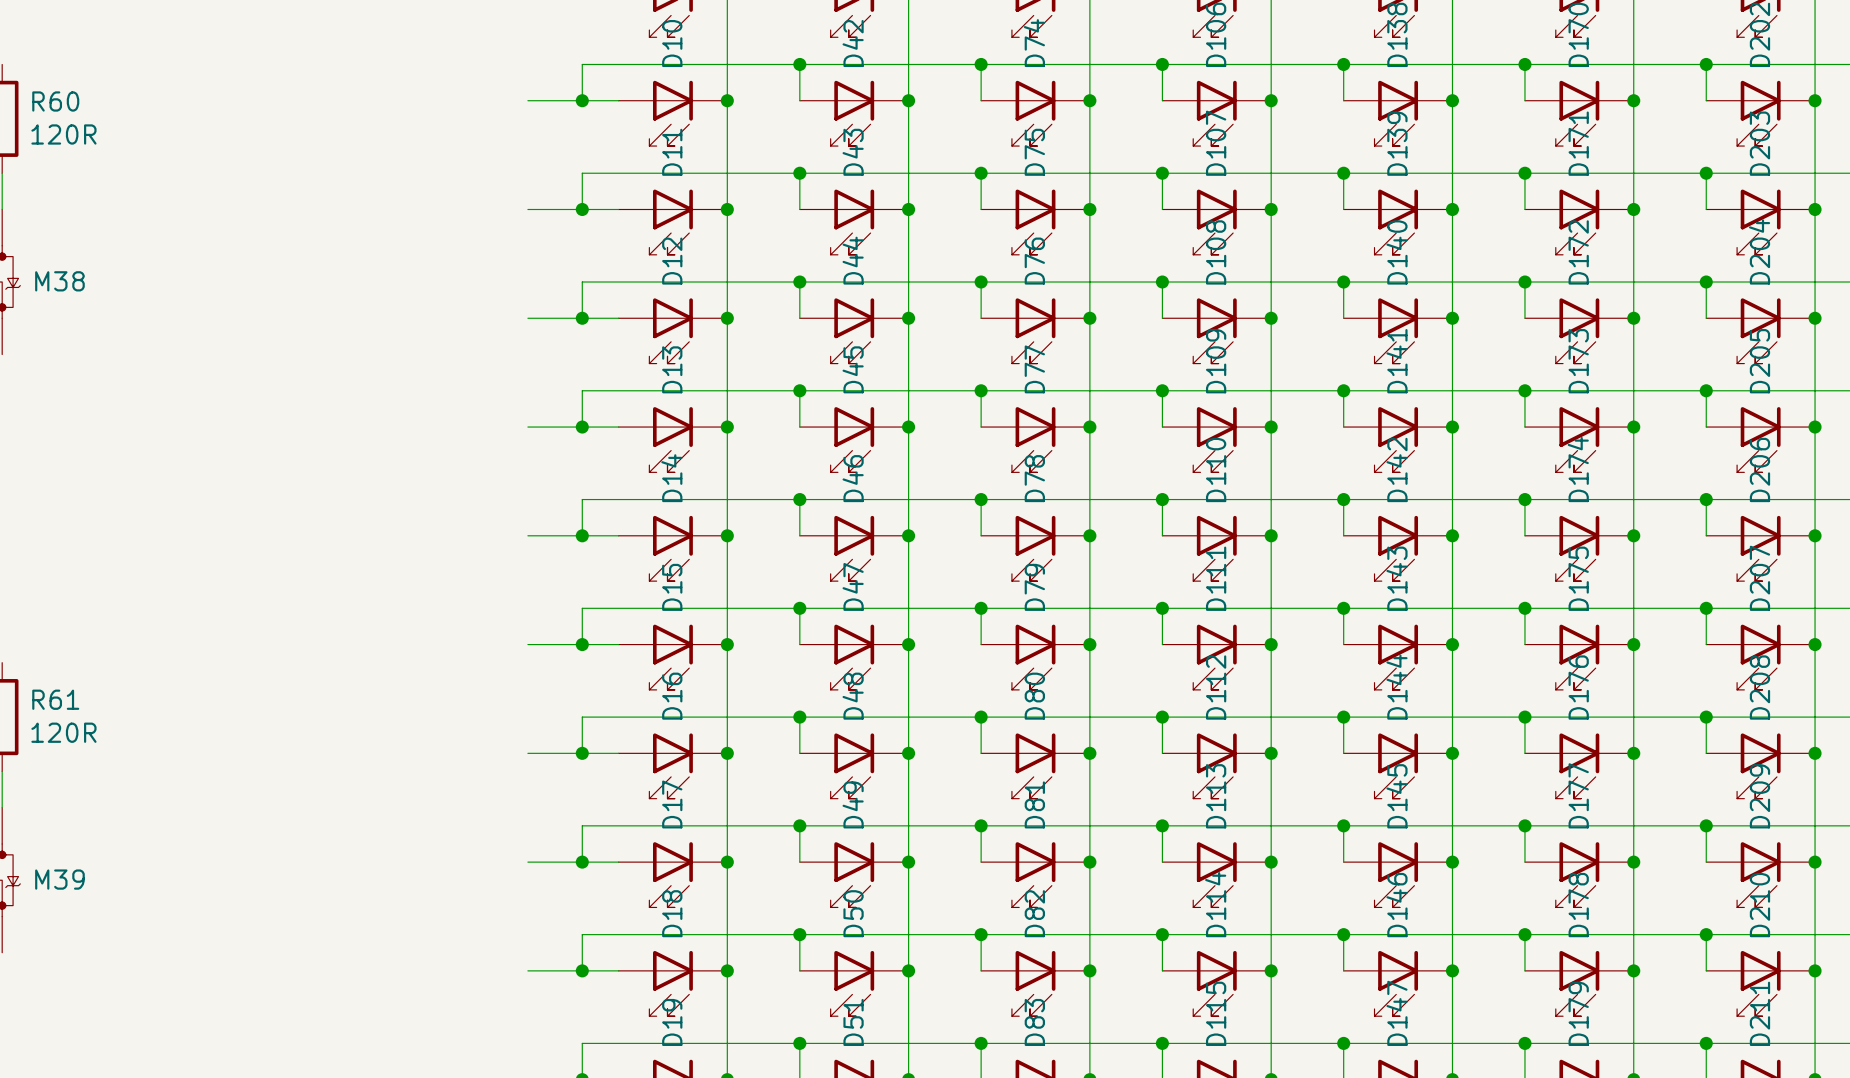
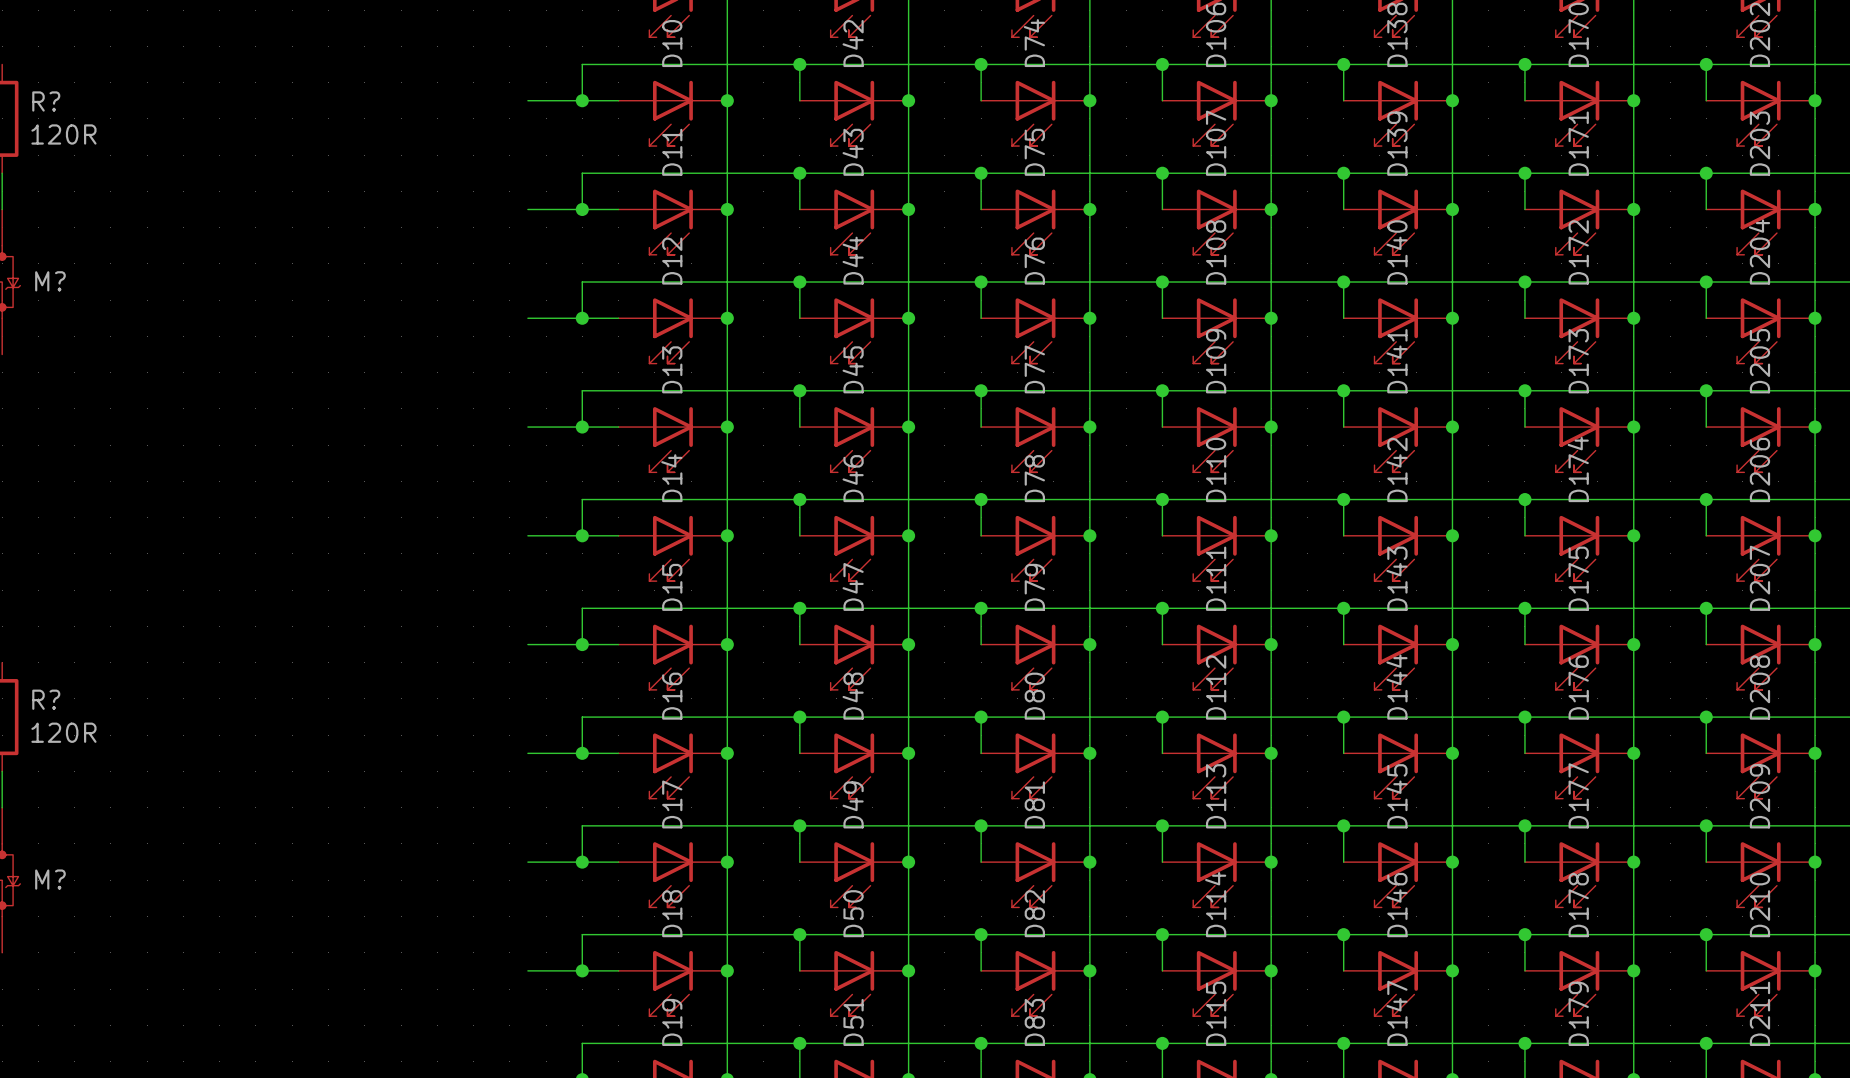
R60 name: R60 (55, 101) -> R? (46, 101)
M38 name: M38 (59, 281) -> M? (50, 281)
R61 name: R61 (55, 699) -> R? (46, 699)
M39 name: M39 (59, 879) -> M? (50, 879)

